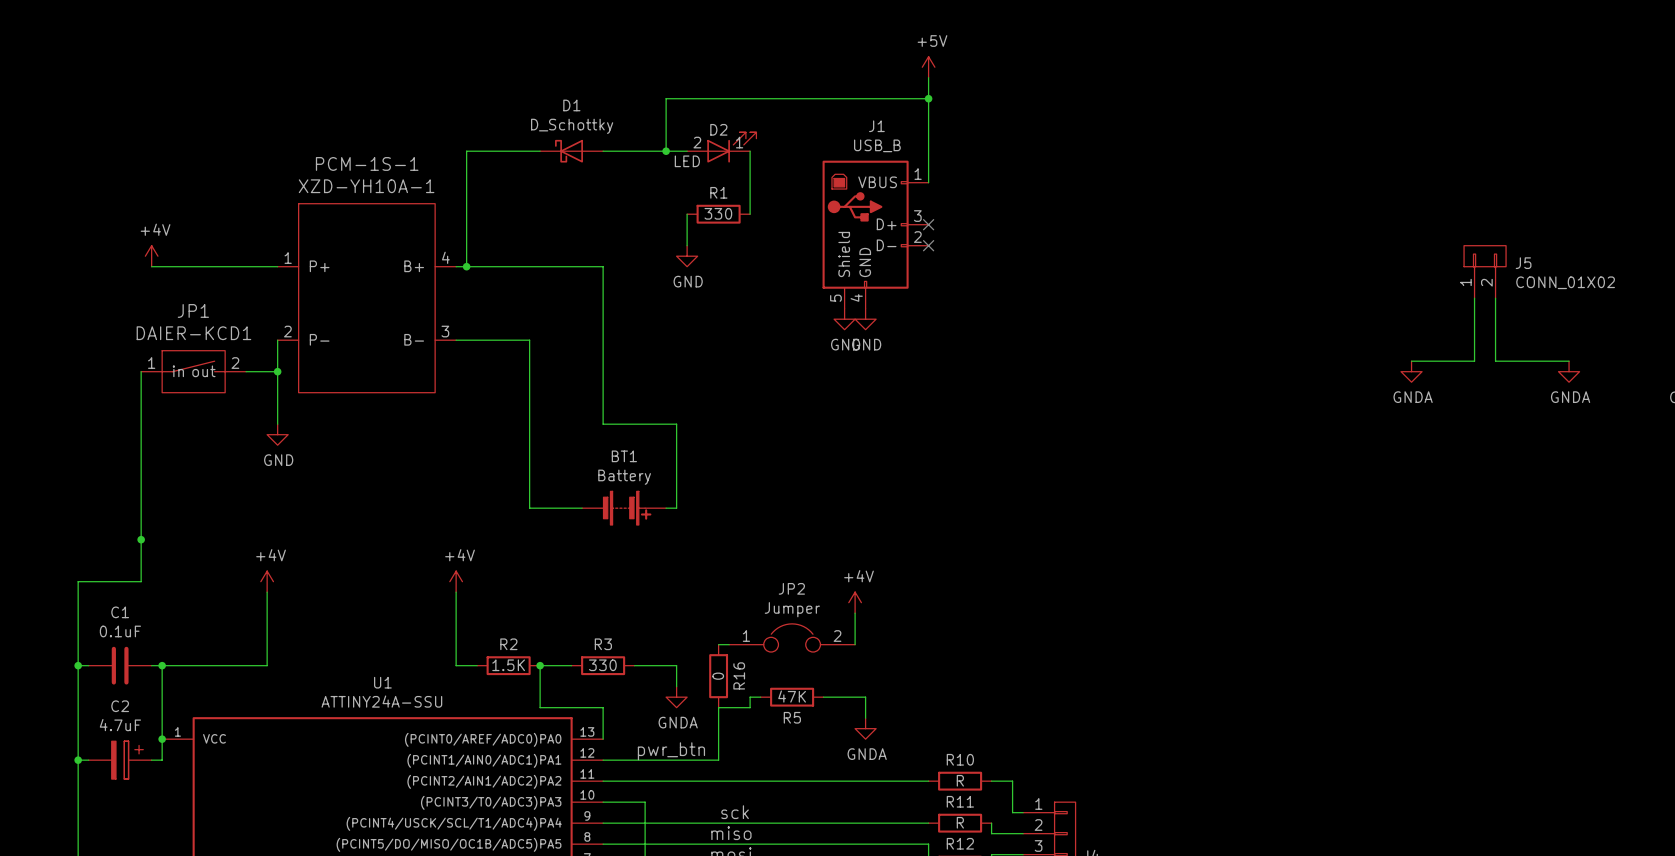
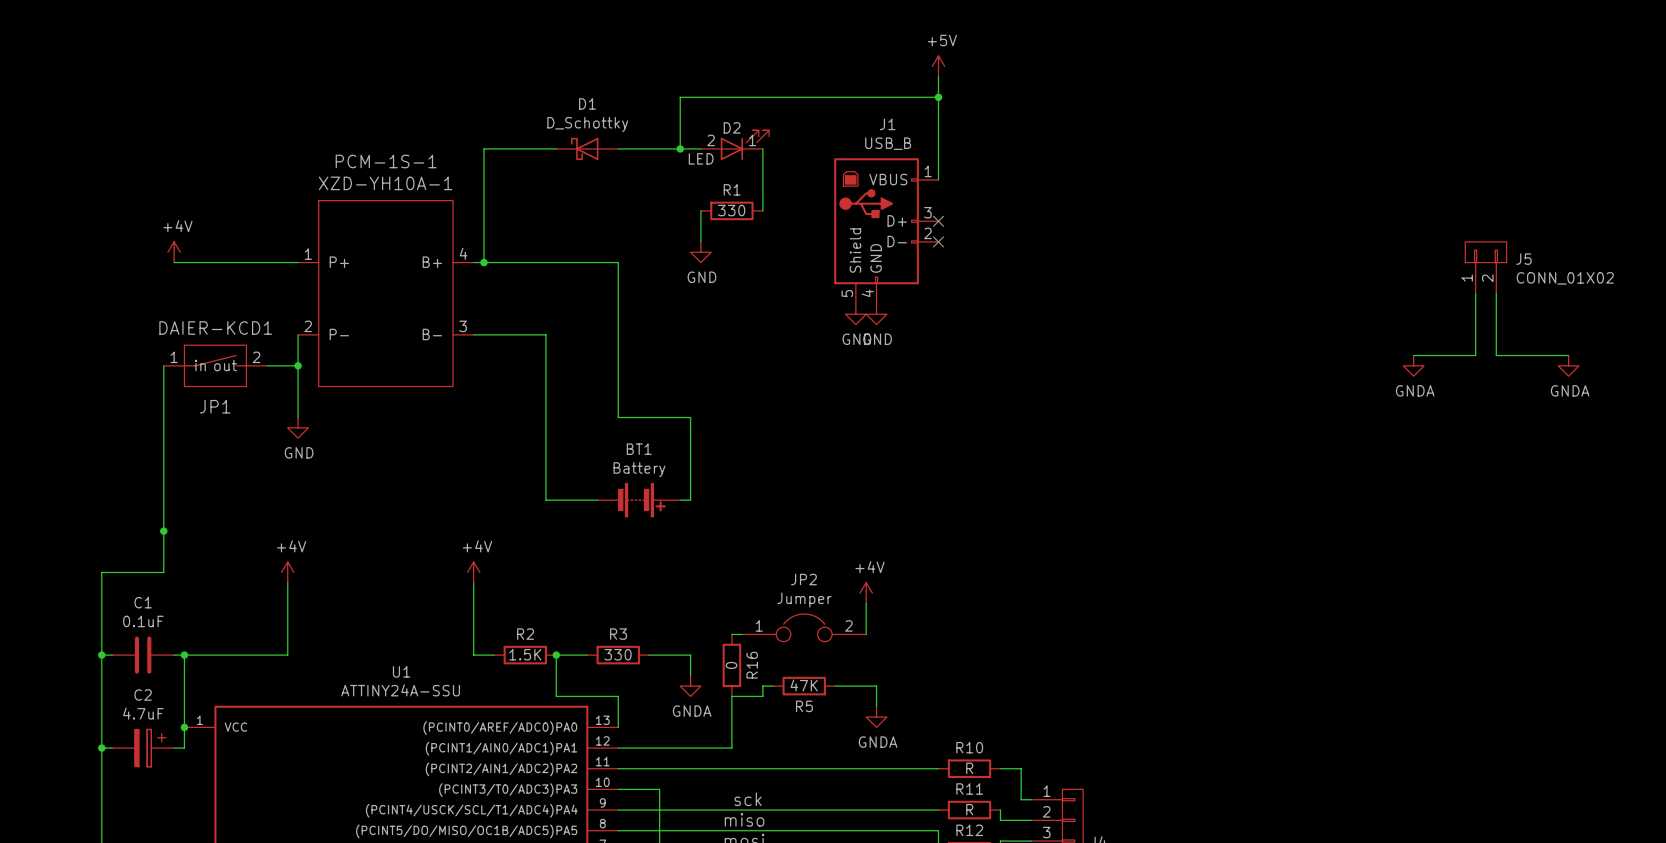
JP1 name position: JP1 (193, 310) -> JP1 (215, 406)
label: pwr_btn (671, 751) -> none

